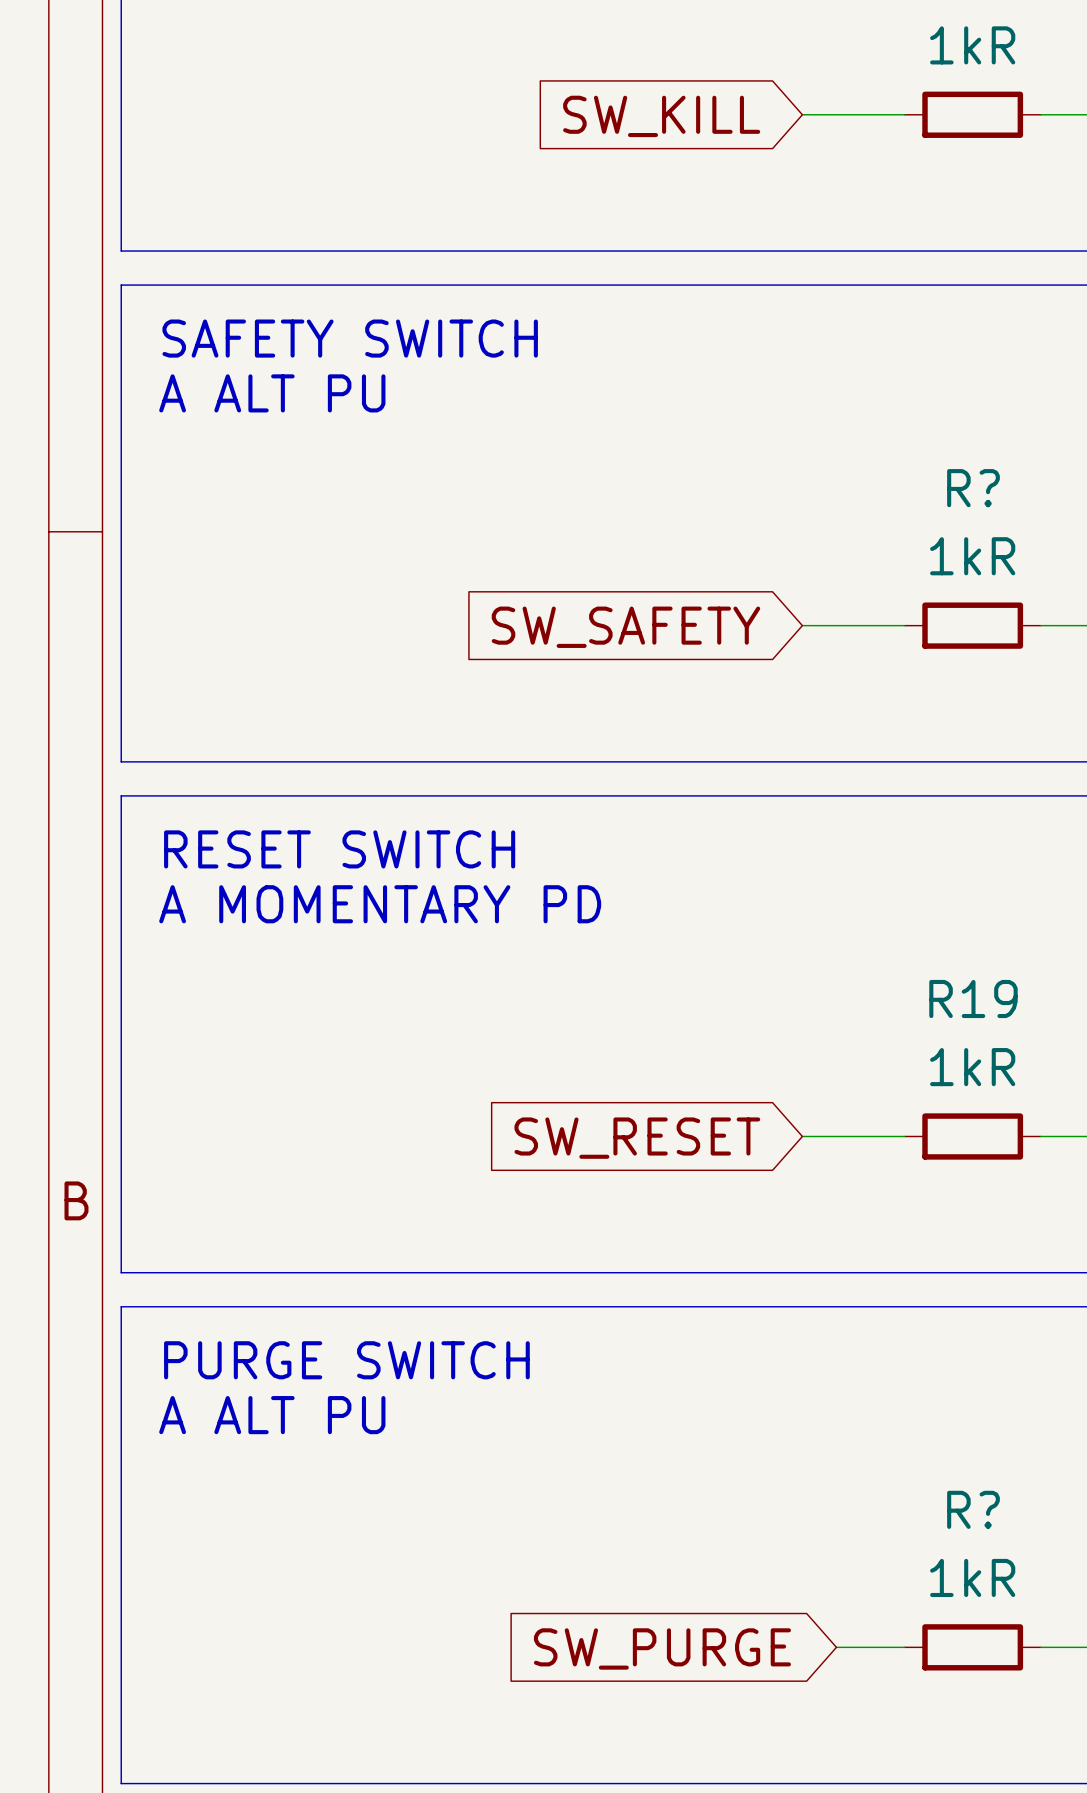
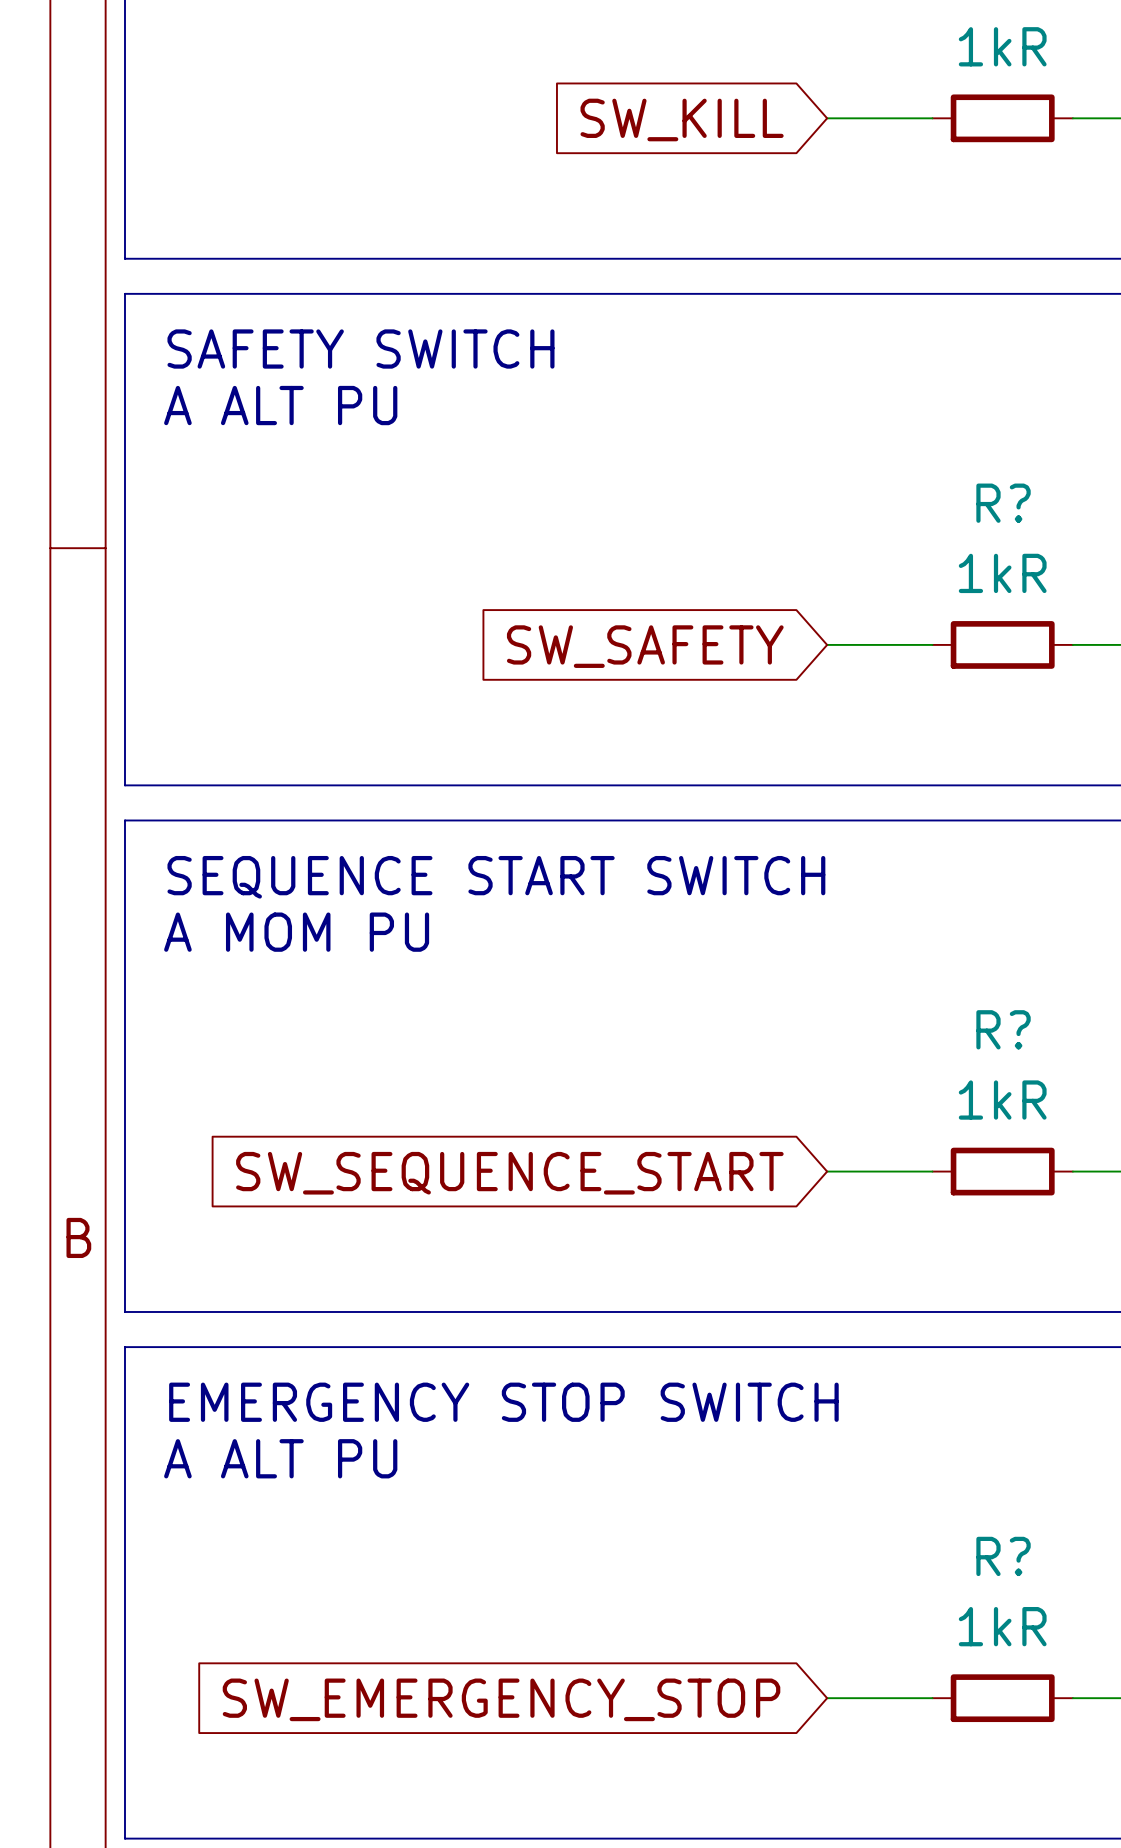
text: RESET SWITCH (339, 849) -> SEQUENCE START SWITCH (496, 877)
text: A MOMENTARY PD (380, 904) -> A MOM PU (296, 932)
R19 name: R19 (973, 998) -> R? (1003, 1029)
global label: SW_RESET (637, 1138) -> SW_SEQUENCE_START (509, 1173)
text: PURGE SWITCH (346, 1360) -> EMERGENCY STOP SWITCH (503, 1402)
wire: none -> (827, 1698) (862, 1698)
global label: none -> SW_EMERGENCY_STOP (501, 1699)
global label: SW_PURGE (662, 1648) -> none

